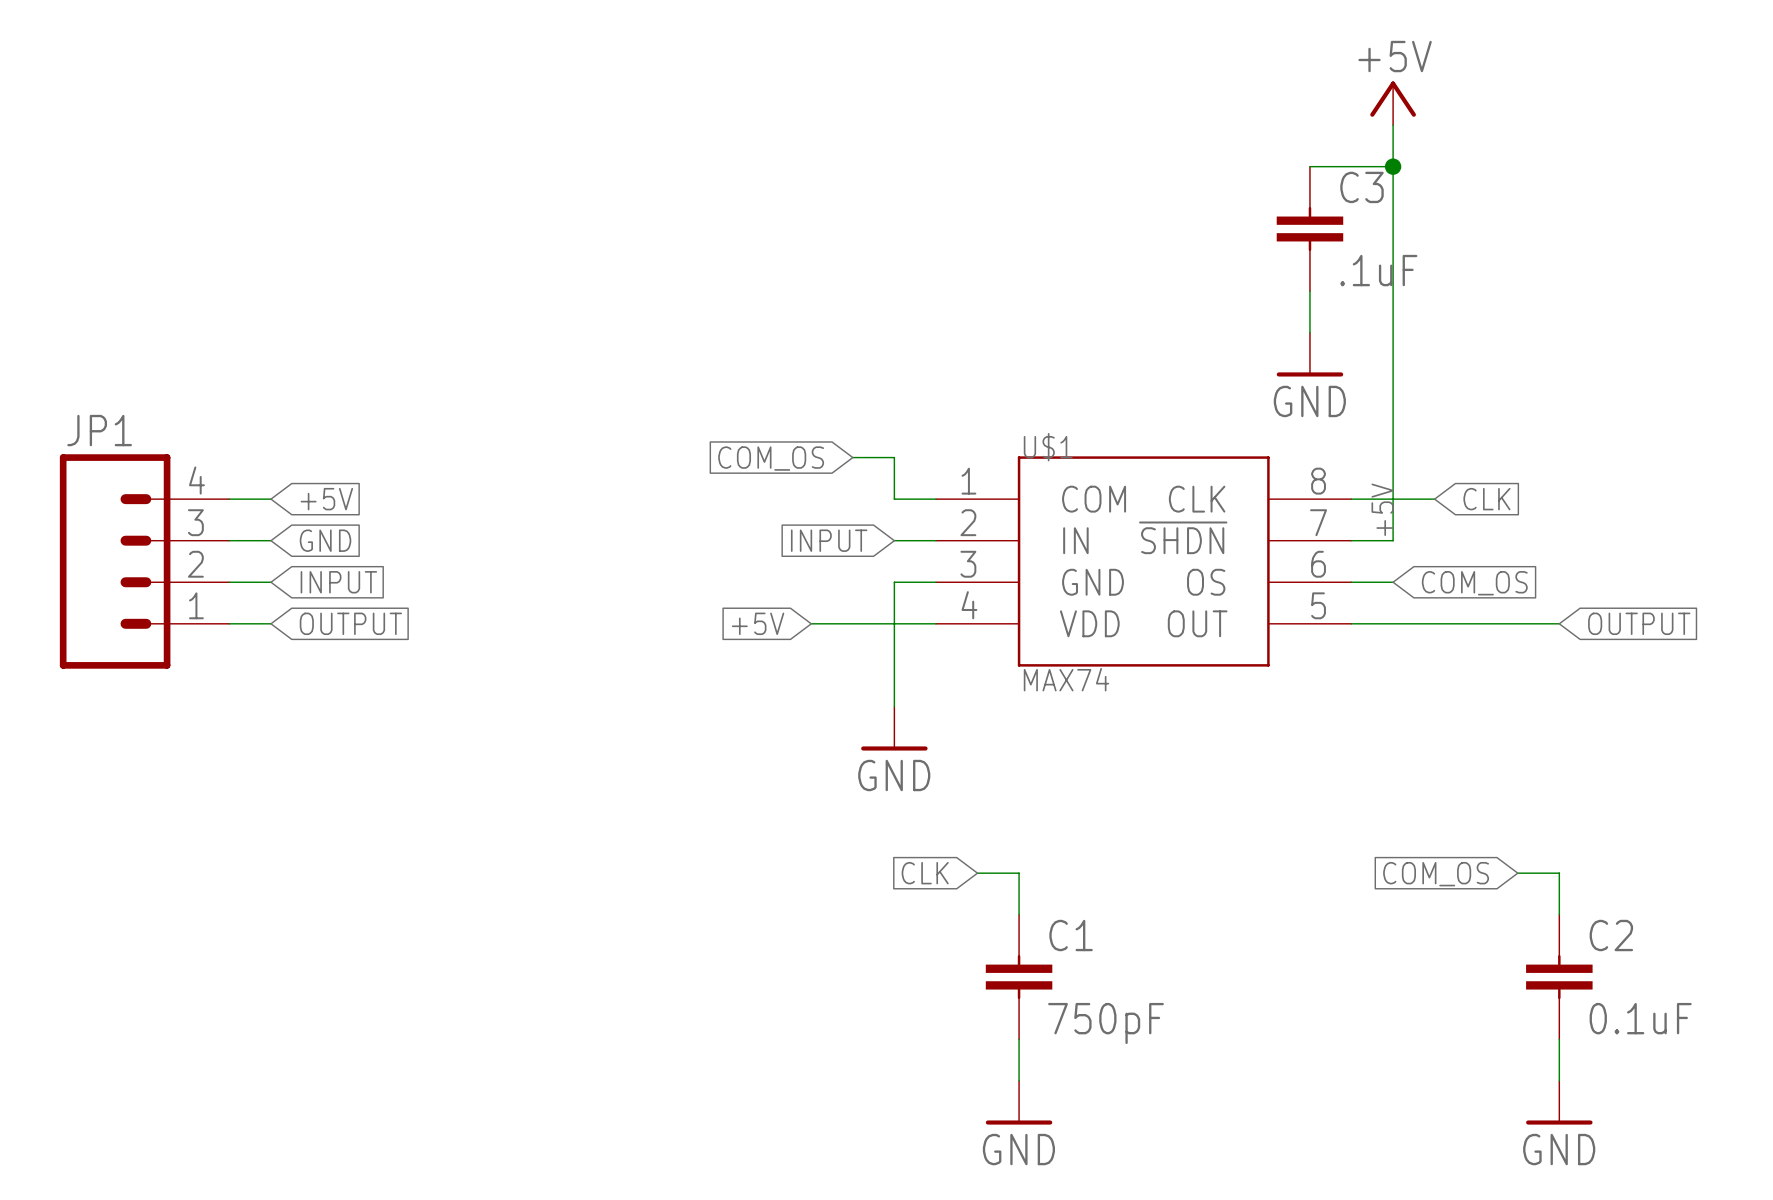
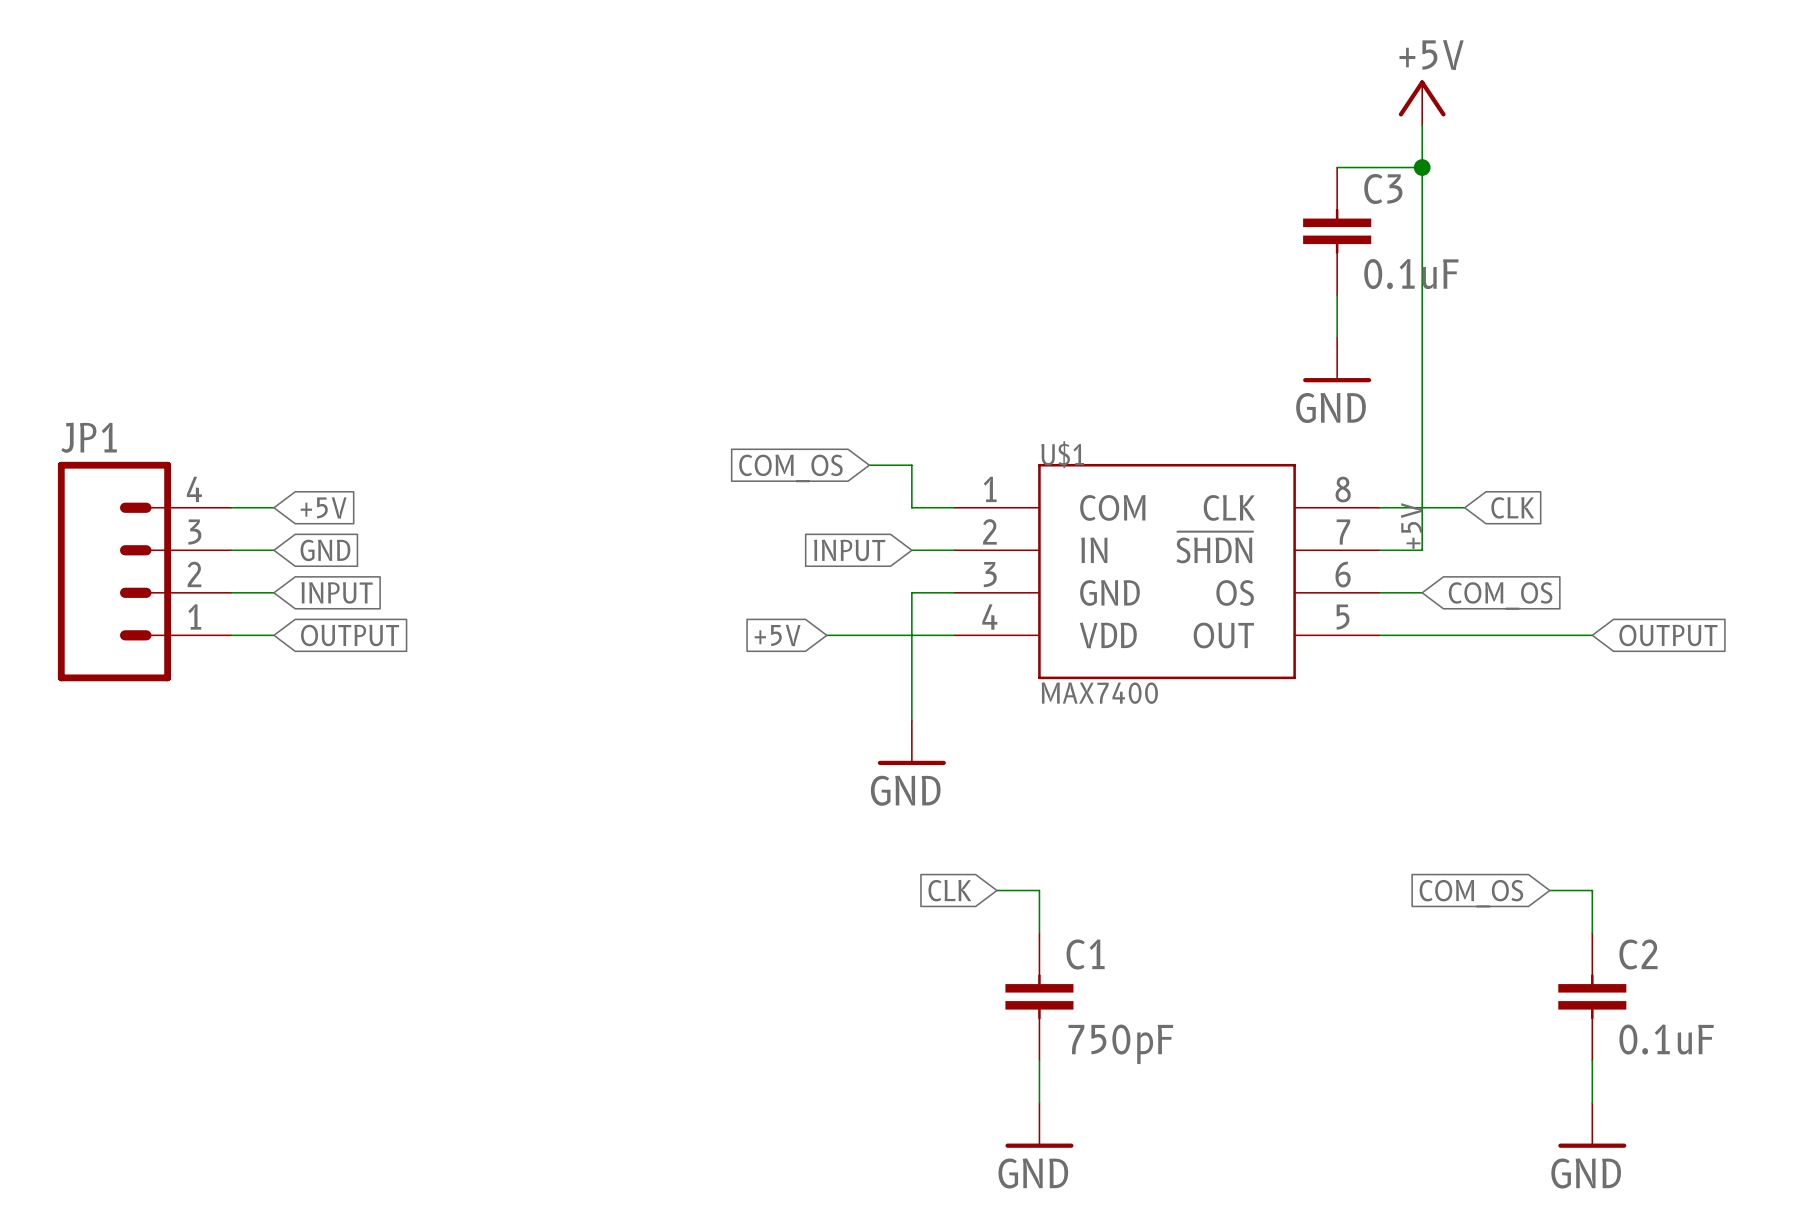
C3 value: .1uF (1378, 270) -> 0.1uF (1411, 274)
U$1 value: MAX74 (1066, 679) -> MAX7400 (1099, 693)

